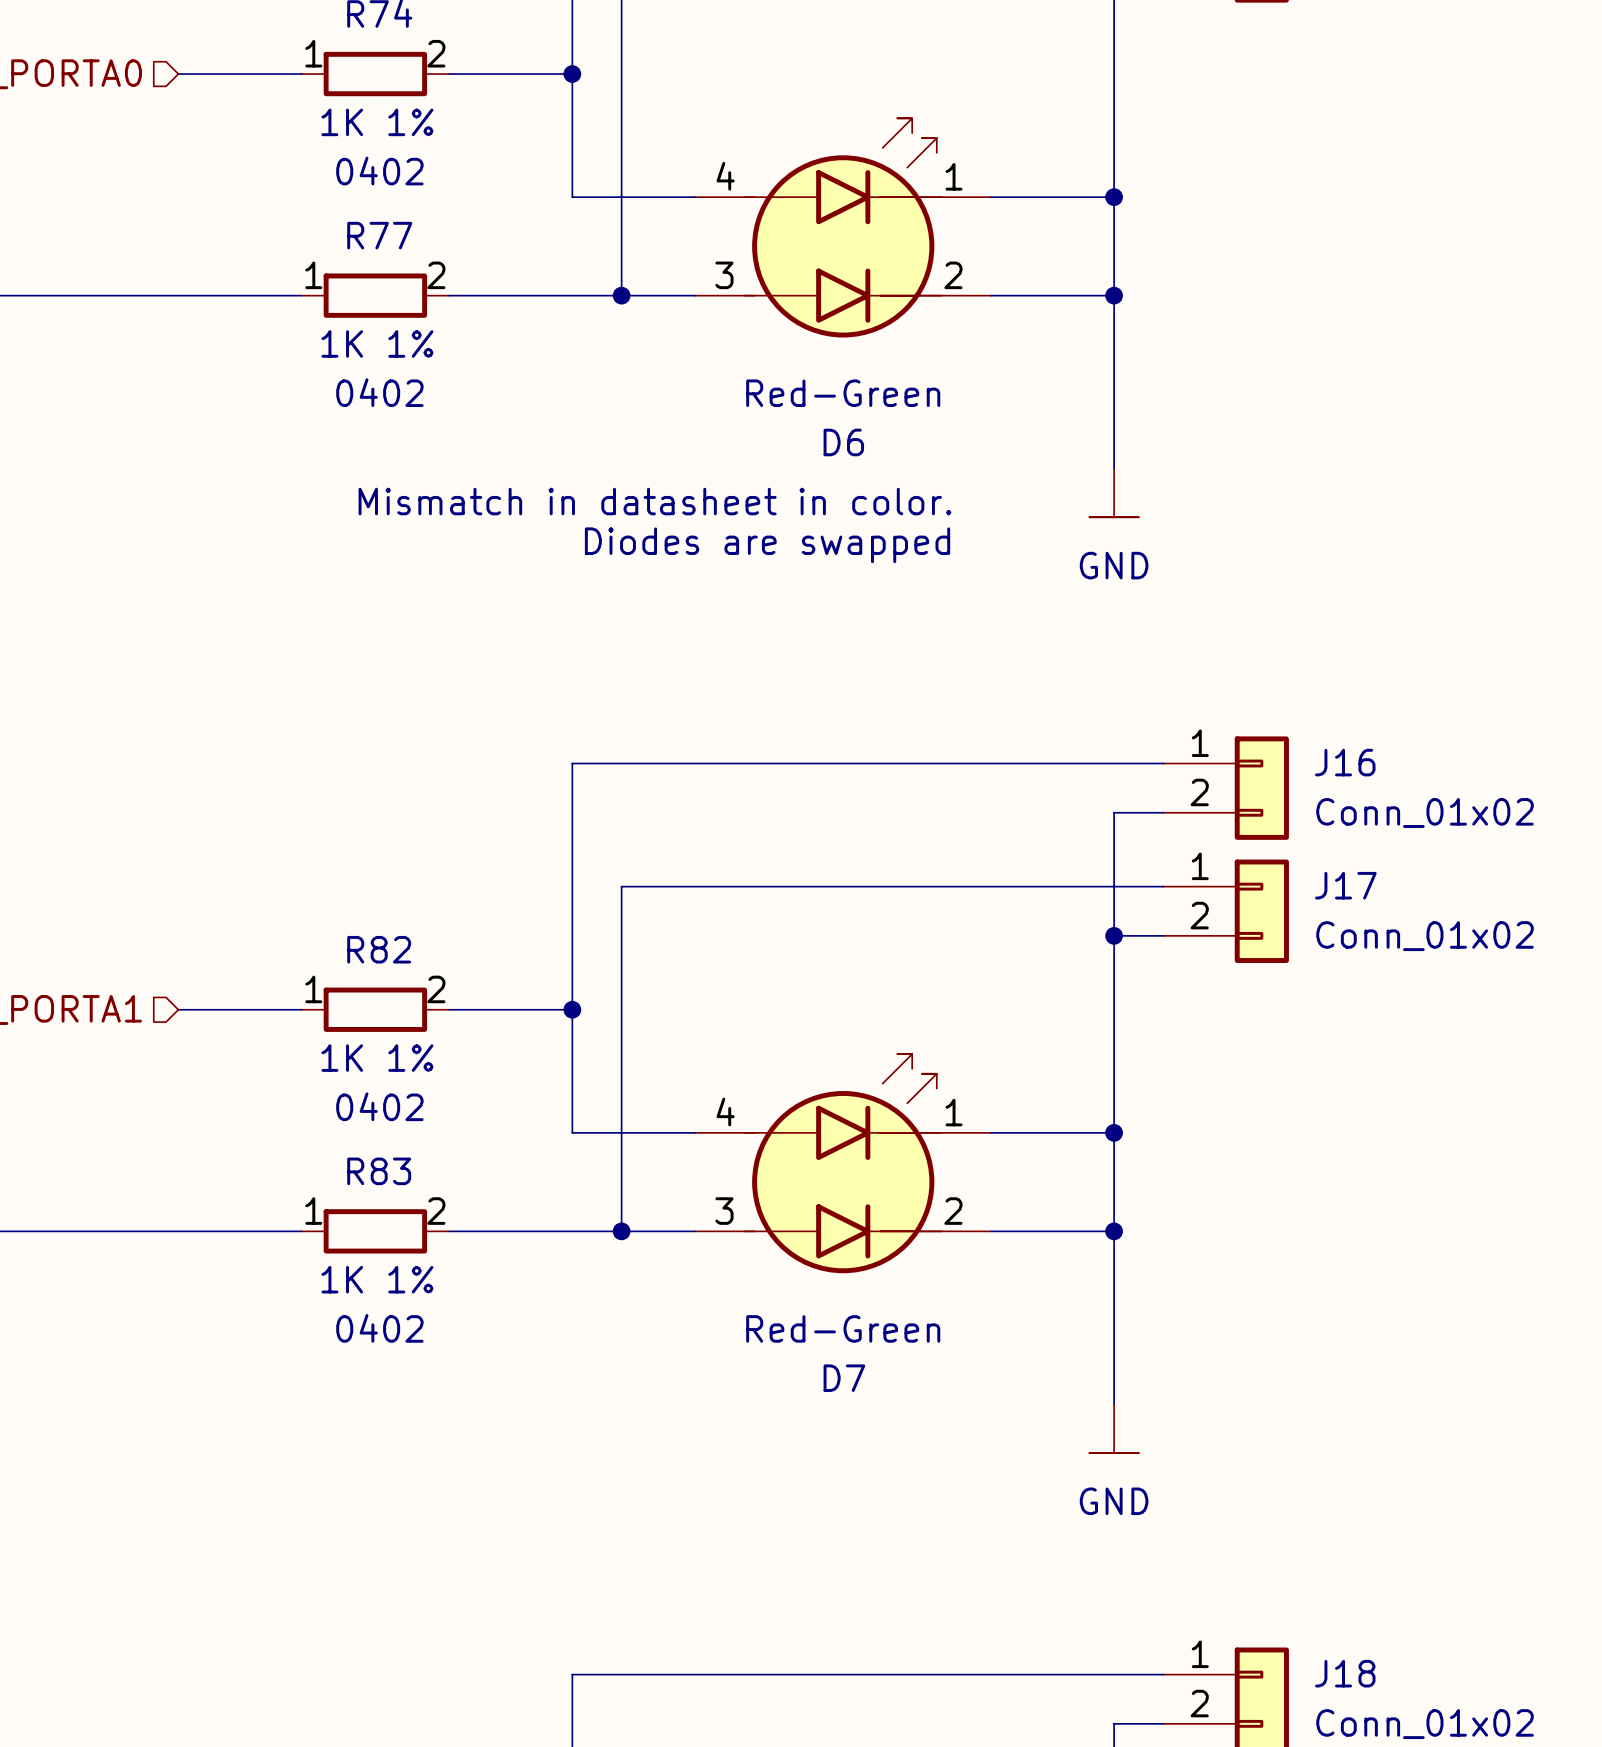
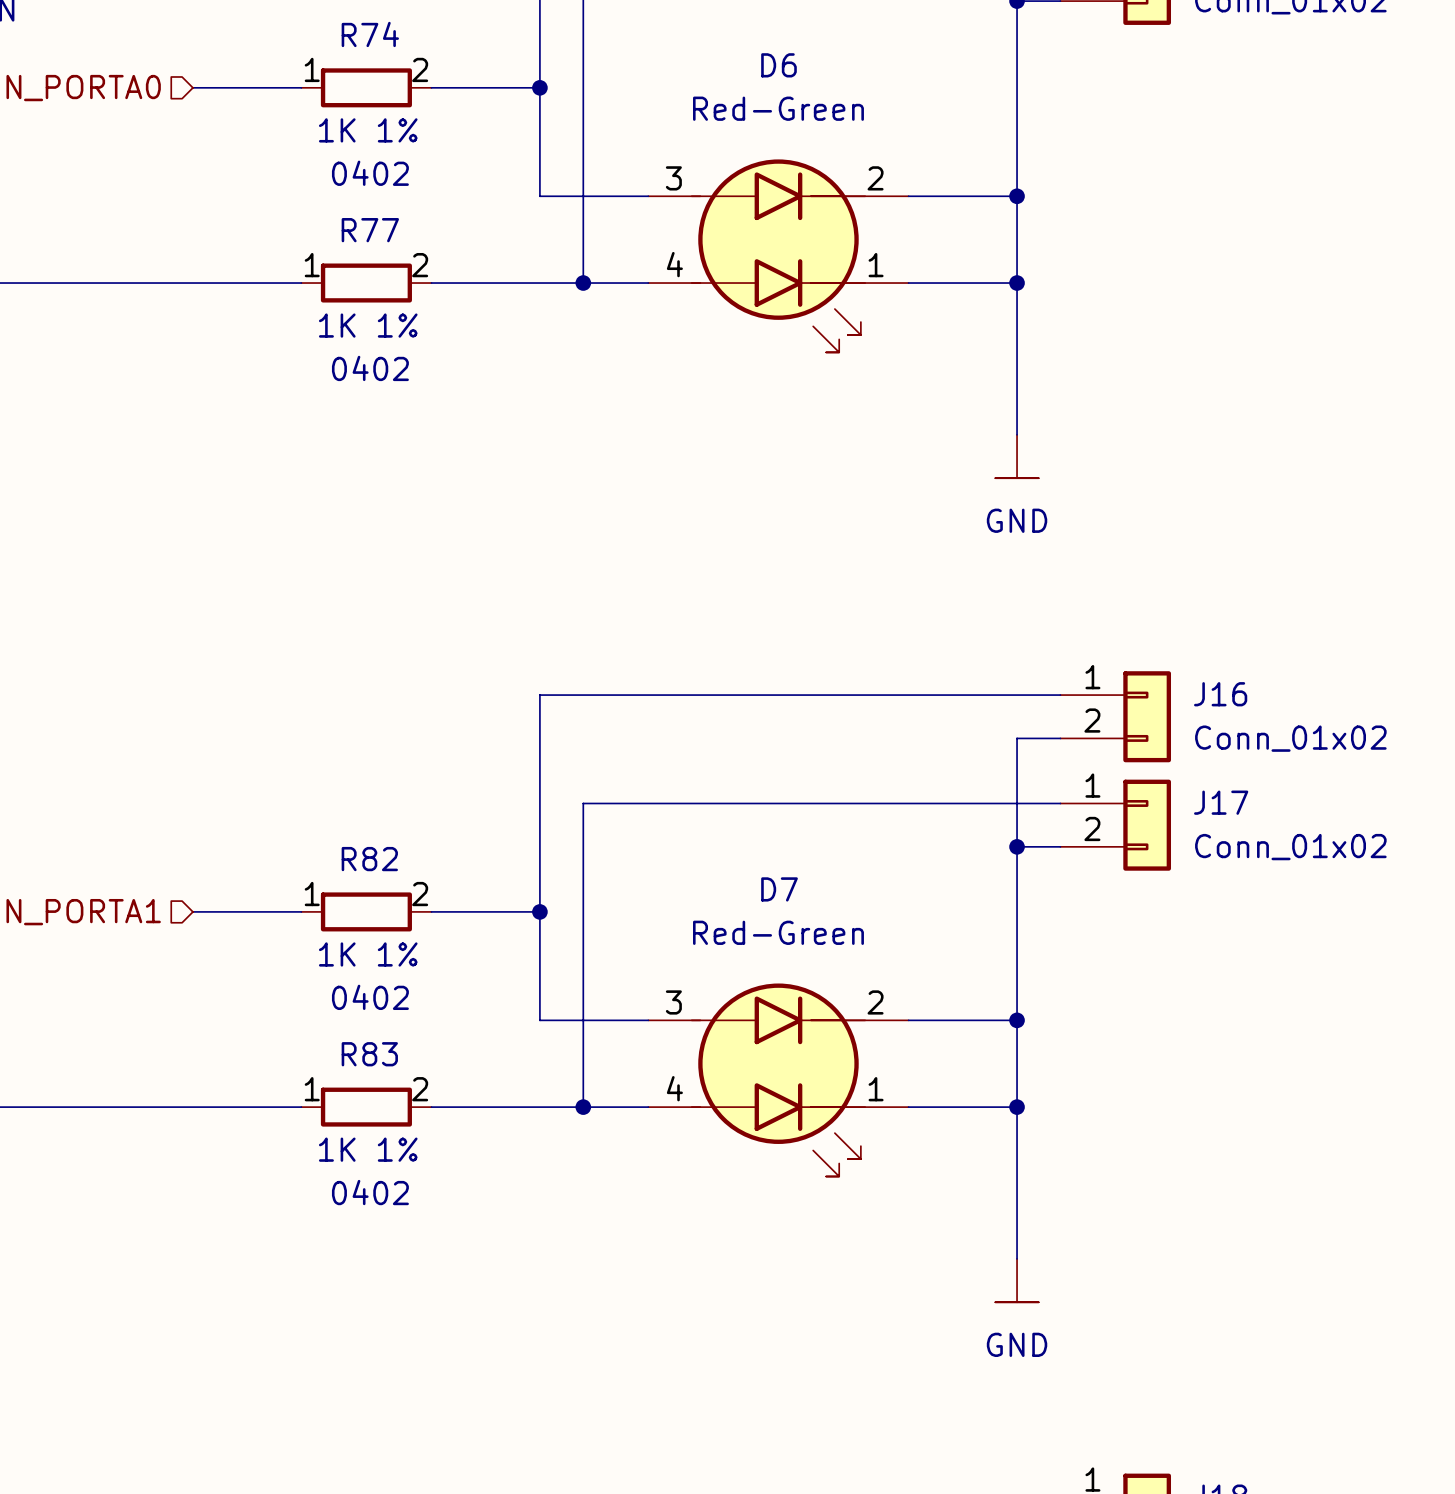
D6 flip: as is (843, 227) -> up-down (778, 255)
text: Mismatch in datasheet in color. (654, 501) -> none
text: Diodes are swapped (767, 545) -> none
D7 flip: as is (843, 1163) -> up-down (778, 1079)

